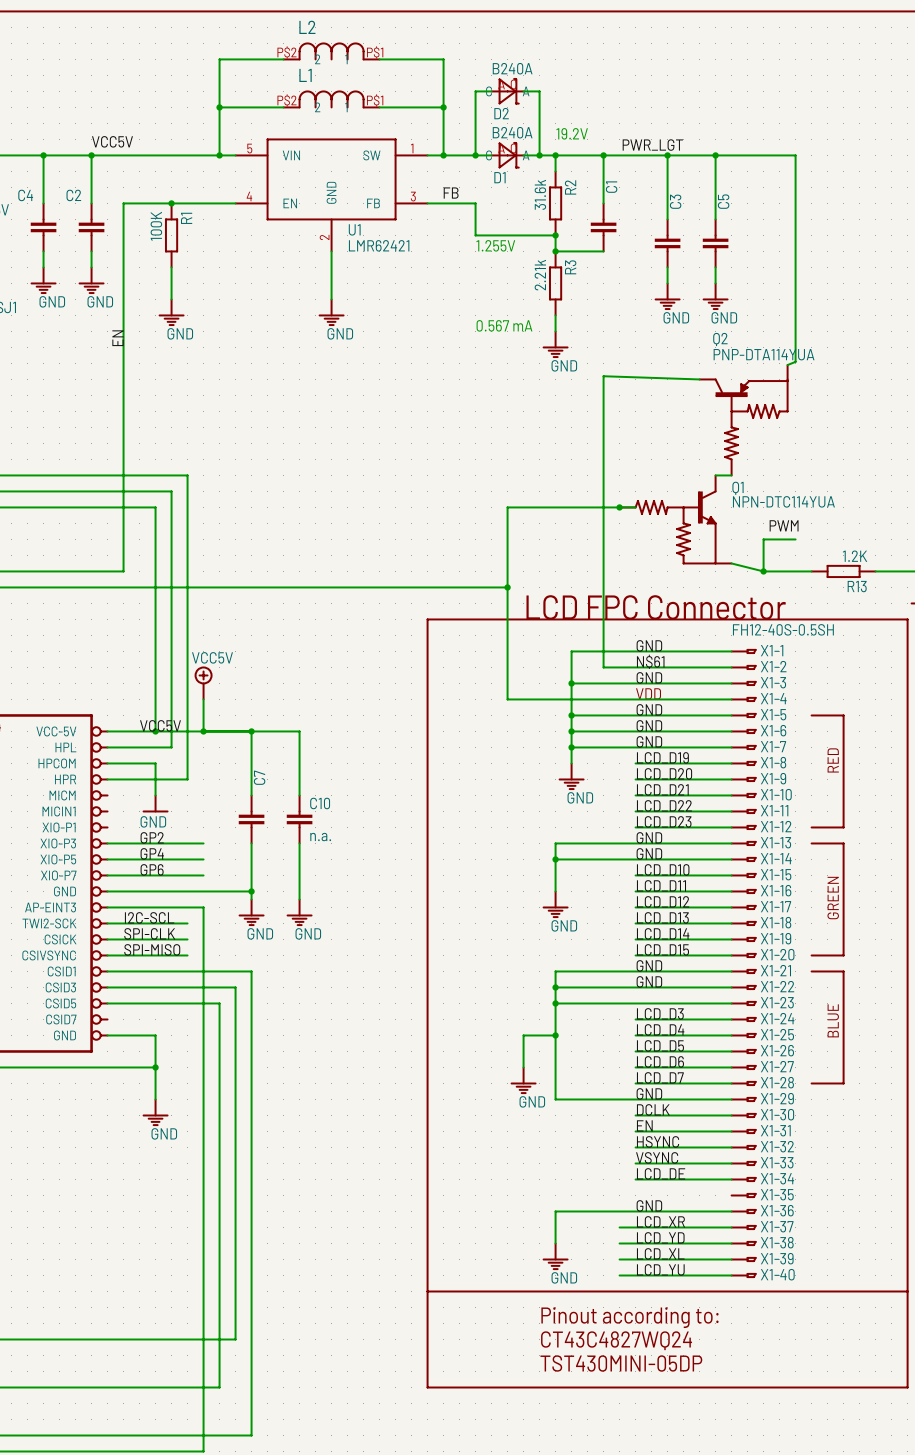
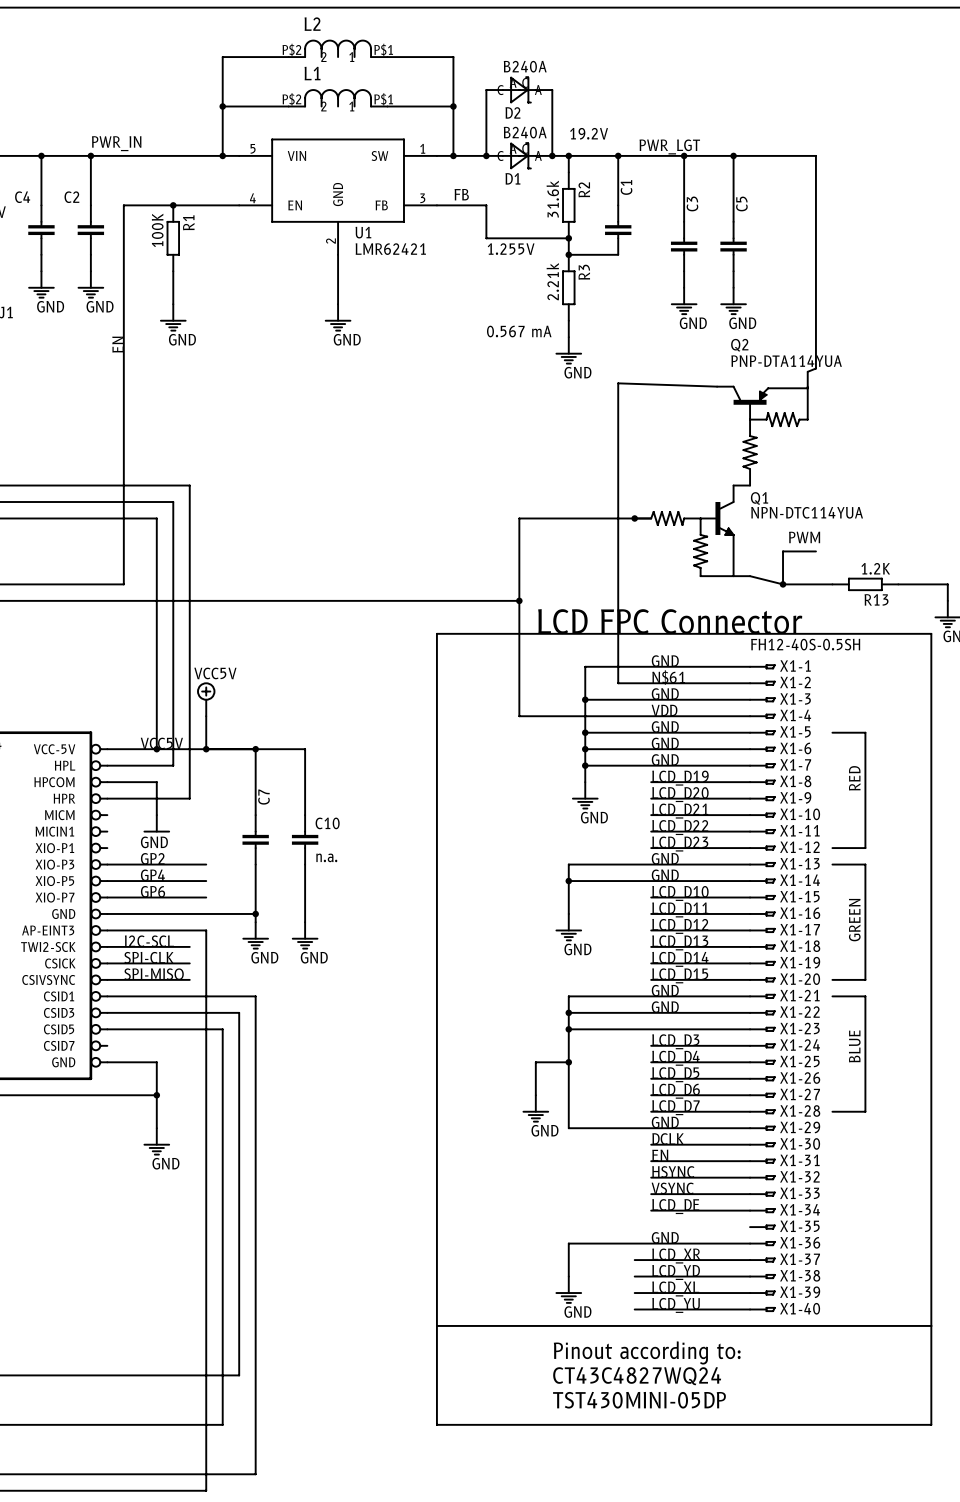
label: VCC5V (112, 141) -> PWR_IN (116, 143)

